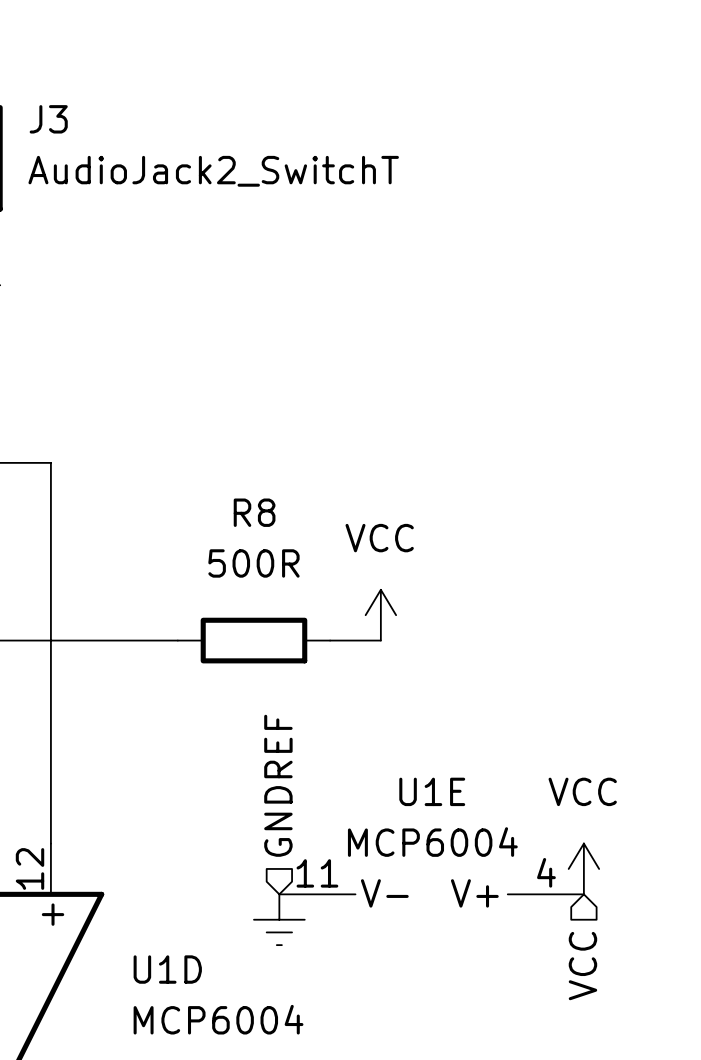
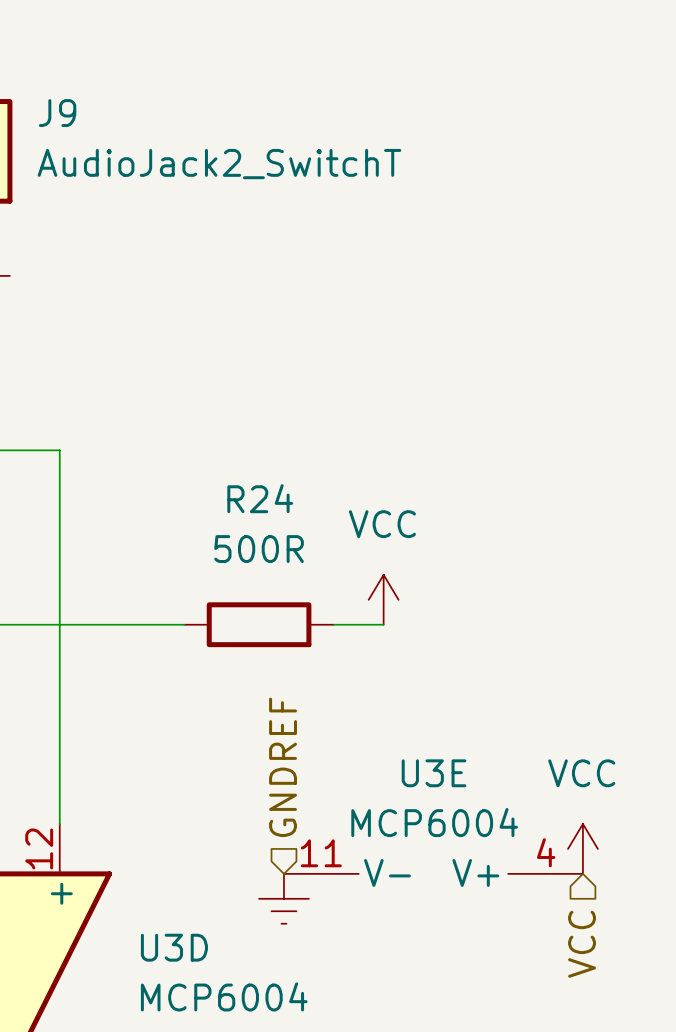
J3 name: J3 (48, 119) -> J9 (57, 113)
R8 name: R8 (254, 512) -> R24 (260, 498)
U1E name: U1E (432, 791) -> U3E (434, 773)
U1D name: U1D (167, 969) -> U3D (174, 947)

